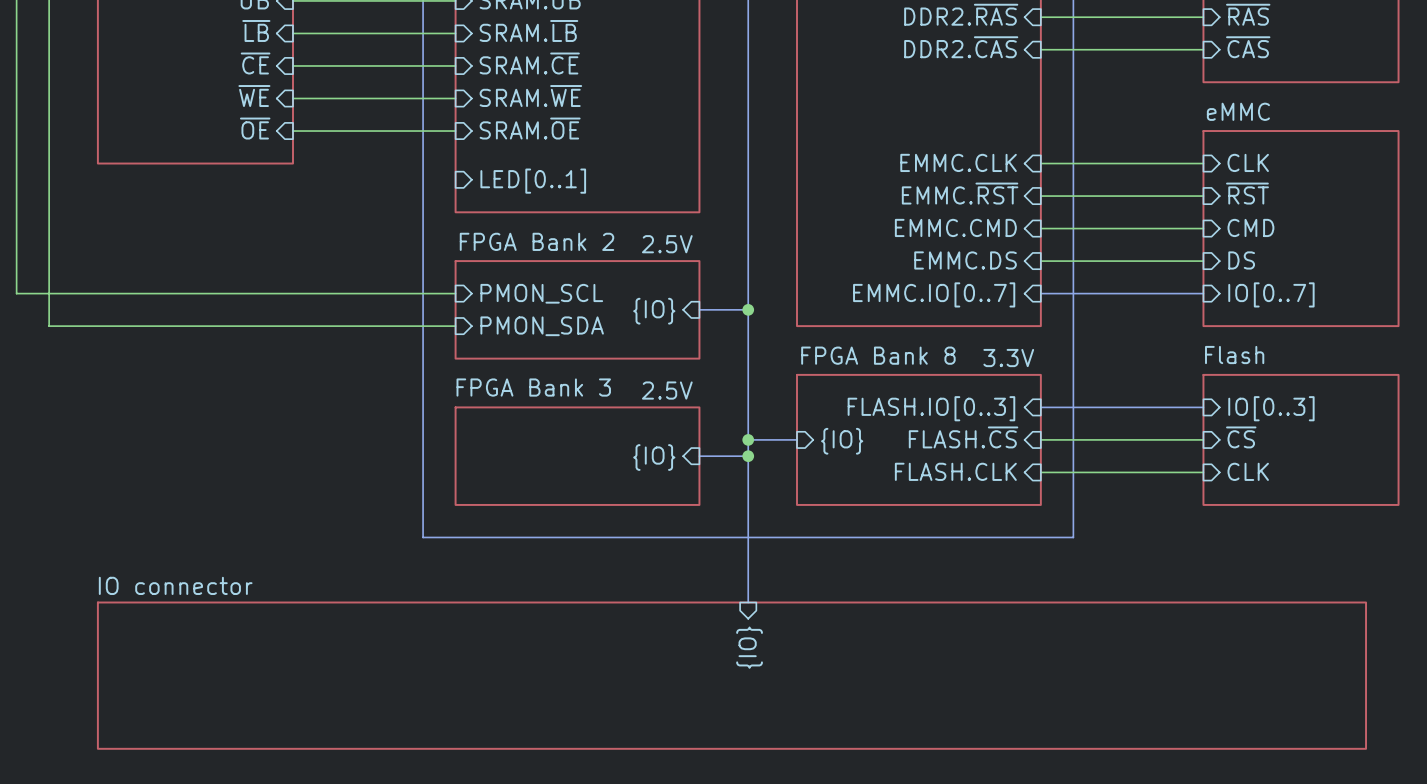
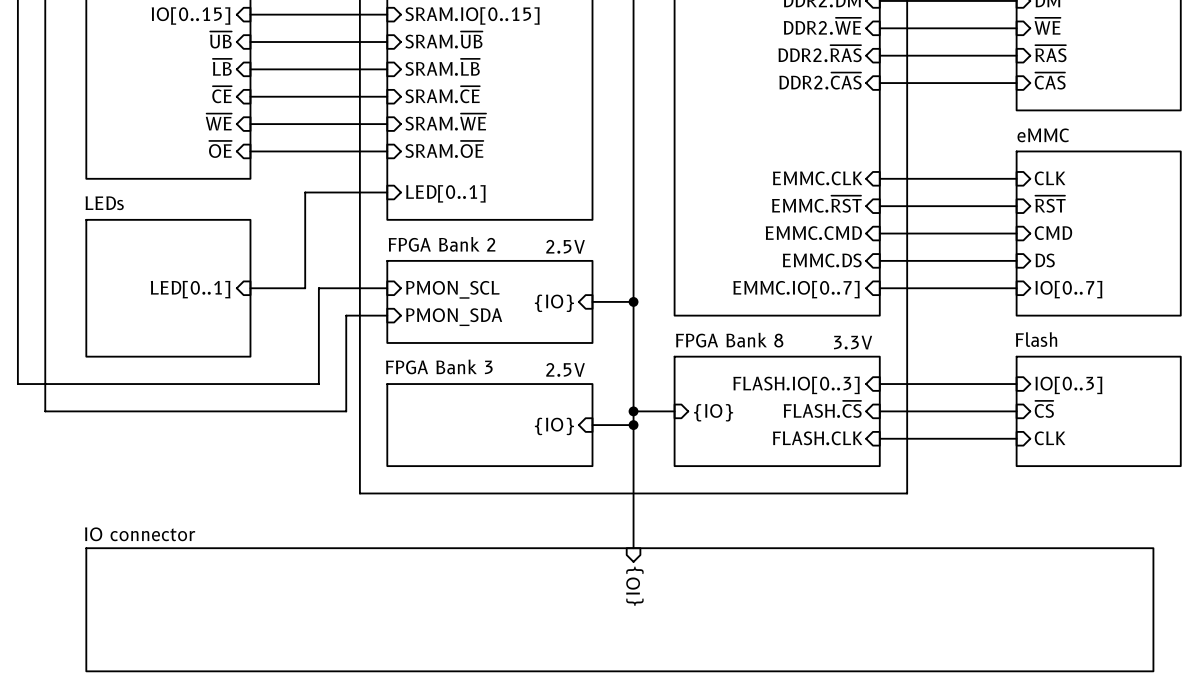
bus: none -> (387, 192) (305, 192) (305, 288) (250, 288)
wire: (16, 293) (374, 293) -> (17, 288) (17, 384) (318, 384) (318, 288)
sheet LEDs: none -> (168, 288)
sheet pin: none -> LED[0..1] (190, 289)
wire: (49, 326) (406, 326) -> (45, 315) (45, 411) (346, 411) (346, 315)

